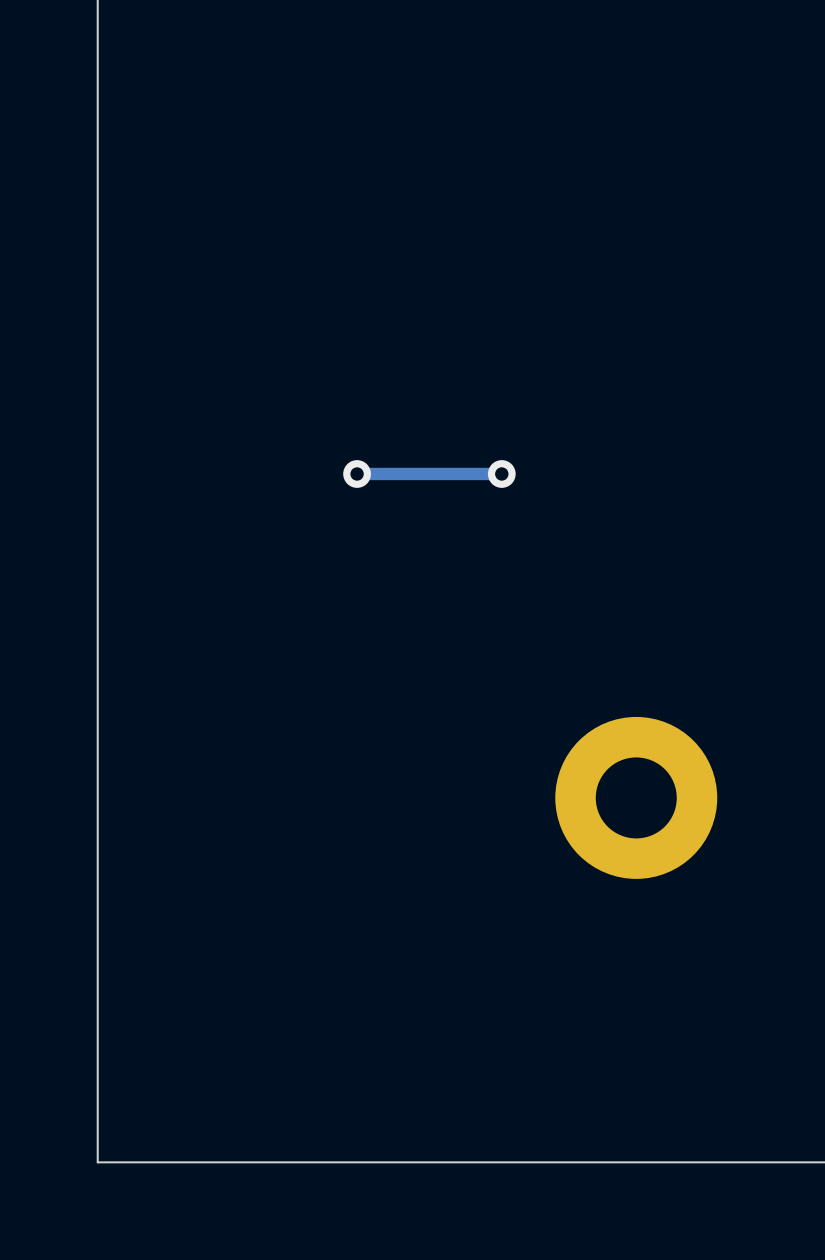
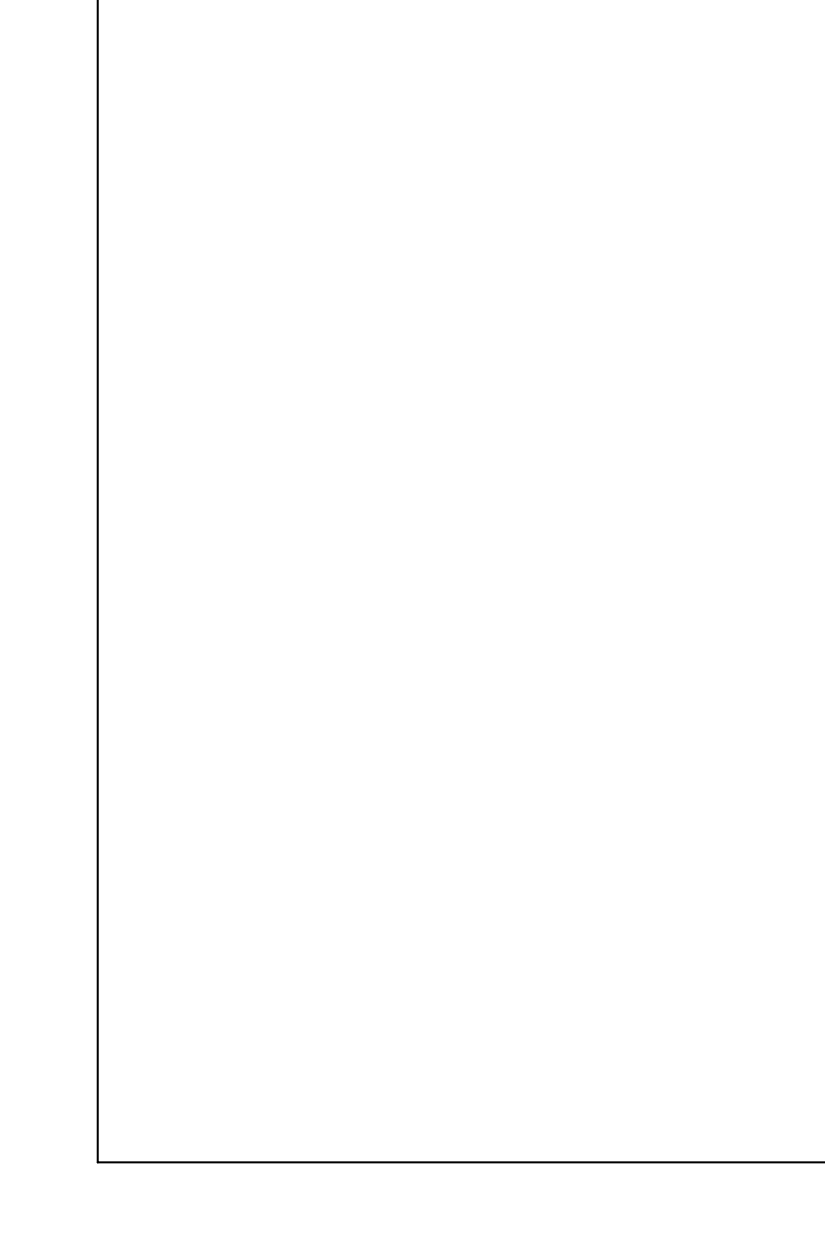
via: (357, 473) -> none
track: (501, 473) (357, 473) -> none
via: (501, 473) -> none
part: (636, 797) -> none

